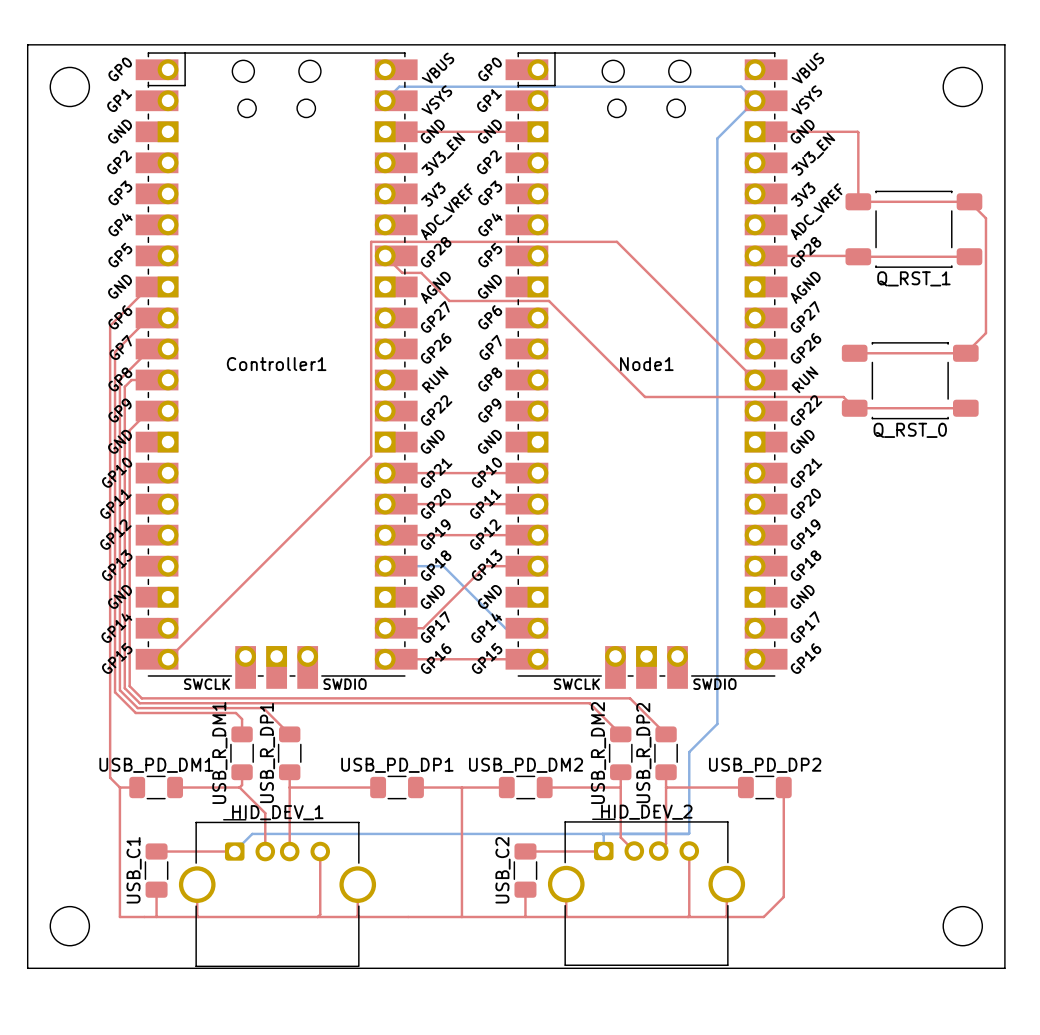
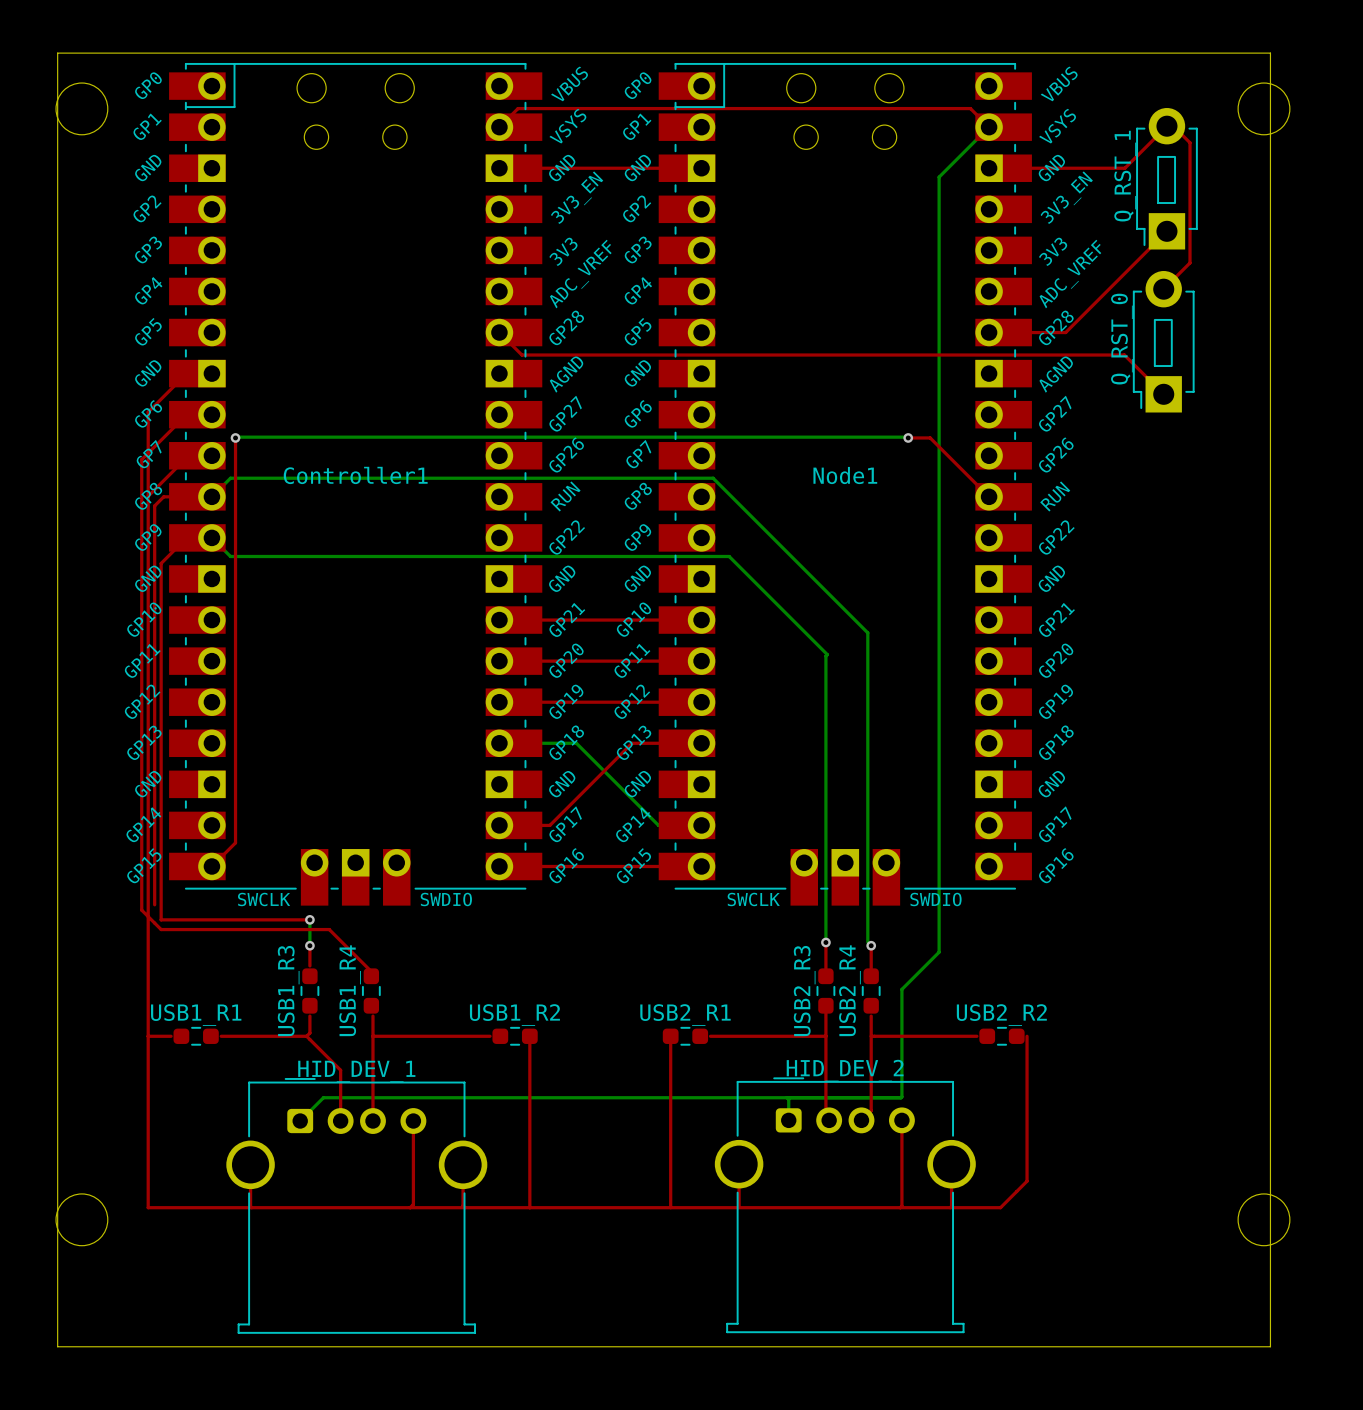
board edge: (51, 44) (27, 44) (27, 968) (1004, 968) (1004, 44) (967, 44) -> (57, 53) (57, 1346) (1270, 1346) (1270, 53)
top track: none -> (499, 127) (518, 108) (970, 108) (989, 127)
bottom track: (385, 100) (399, 86) (741, 86) (755, 100) -> none
top track: none -> (1173, 126) (1190, 142) (1190, 262) (1163, 289)
top track: (857, 131) (858, 201) (969, 201) (985, 218) (985, 333) (965, 353) (854, 353) -> (1124, 168) (1166, 126)
Q_RST_1 footprint: [845, 190, 983, 268] -> [1136, 108, 1198, 250]
top track: (813, 255) (857, 255) -> (1065, 332) (1166, 231)
top track: (858, 256) (969, 256) -> none
top track: (421, 272) (449, 300) (549, 300) (645, 396) (843, 396) (854, 408) (965, 408) -> (547, 355) (1124, 355) (1163, 394)
Q_RST_1 name position: Q_RST_1 (913, 278) -> Q_RST_1 (1125, 176)
top track: (119, 316) (110, 325) (110, 777) (119, 787) -> (148, 412) (148, 496)
bottom track: none -> (236, 437) (908, 437)
via: none -> (235, 437)
top track: none -> (908, 437) (930, 437)
via: none -> (908, 437)
top track: (710, 335) (616, 241) (371, 241) (371, 456) (185, 641) -> (235, 437) (235, 842)
Q_RST_0 footprint: [841, 342, 979, 420] -> [1132, 271, 1195, 413]
bottom track: none -> (211, 496) (230, 478) (713, 478) (867, 632) (867, 942)
bottom track: none -> (211, 537) (230, 556) (729, 556) (827, 654) (825, 942)
Q_RST_0 name position: Q_RST_0 (910, 430) -> Q_RST_0 (1121, 339)
top track: (129, 686) (141, 698) (630, 698) (666, 734) -> (161, 902) (161, 919) (309, 919)
top track: (124, 688) (139, 703) (589, 703) (620, 734) -> none
top track: (119, 690) (137, 708) (263, 708) (289, 734) -> (148, 907) (148, 1036)
bottom track: none -> (309, 919) (309, 945)
via: none -> (309, 919)
top track: (129, 706) (135, 713) (235, 713) (242, 719) -> (161, 929) (329, 929) (371, 971) (371, 976)
top track: none -> (825, 942) (825, 976)
via: none -> (825, 942)
via: none -> (309, 945)
top track: none -> (871, 945) (871, 976)
via: none -> (871, 945)
USB_R_DM1: (242, 753) -> none
USB1_R3: none -> (309, 991)
USB1_R4: none -> (371, 991)
USB_R_DP1: (289, 753) -> none
USB_R_DM2: (620, 753) -> none
USB2_R3: none -> (825, 991)
USB_R_DP2: (666, 753) -> none
USB2_R4: none -> (871, 991)
top track: (620, 772) (620, 837) (631, 848) -> (825, 1005) (825, 1117)
USB_PD_DM1: (156, 787) -> none
USB1_R1: none -> (196, 1036)
USB_PD_DP1: (397, 787) -> none
USB1_R2: none -> (515, 1036)
top track: none -> (529, 1036) (529, 1207)
top track: (415, 787) (506, 787) -> none
top track: (461, 787) (461, 917) -> (670, 1036) (670, 1207)
USB_PD_DM2: (525, 787) -> none
USB2_R1: none -> (685, 1036)
top track: none -> (811, 1036) (825, 1036)
USB_PD_DP2: (764, 787) -> none
USB2_R2: none -> (1001, 1036)
HID_DEV_2 footprint: [547, 818, 746, 966] -> [714, 1077, 976, 1334]
HID_DEV_1 footprint: [178, 819, 377, 968] -> [226, 1078, 488, 1334]
top track: (156, 851) (234, 851) -> none
top track: (525, 851) (603, 851) -> none
USB_C1: (156, 870) -> none
USB_C2: (525, 870) -> none
top track: (156, 889) (156, 917) -> none
top track: (525, 889) (525, 917) -> none

